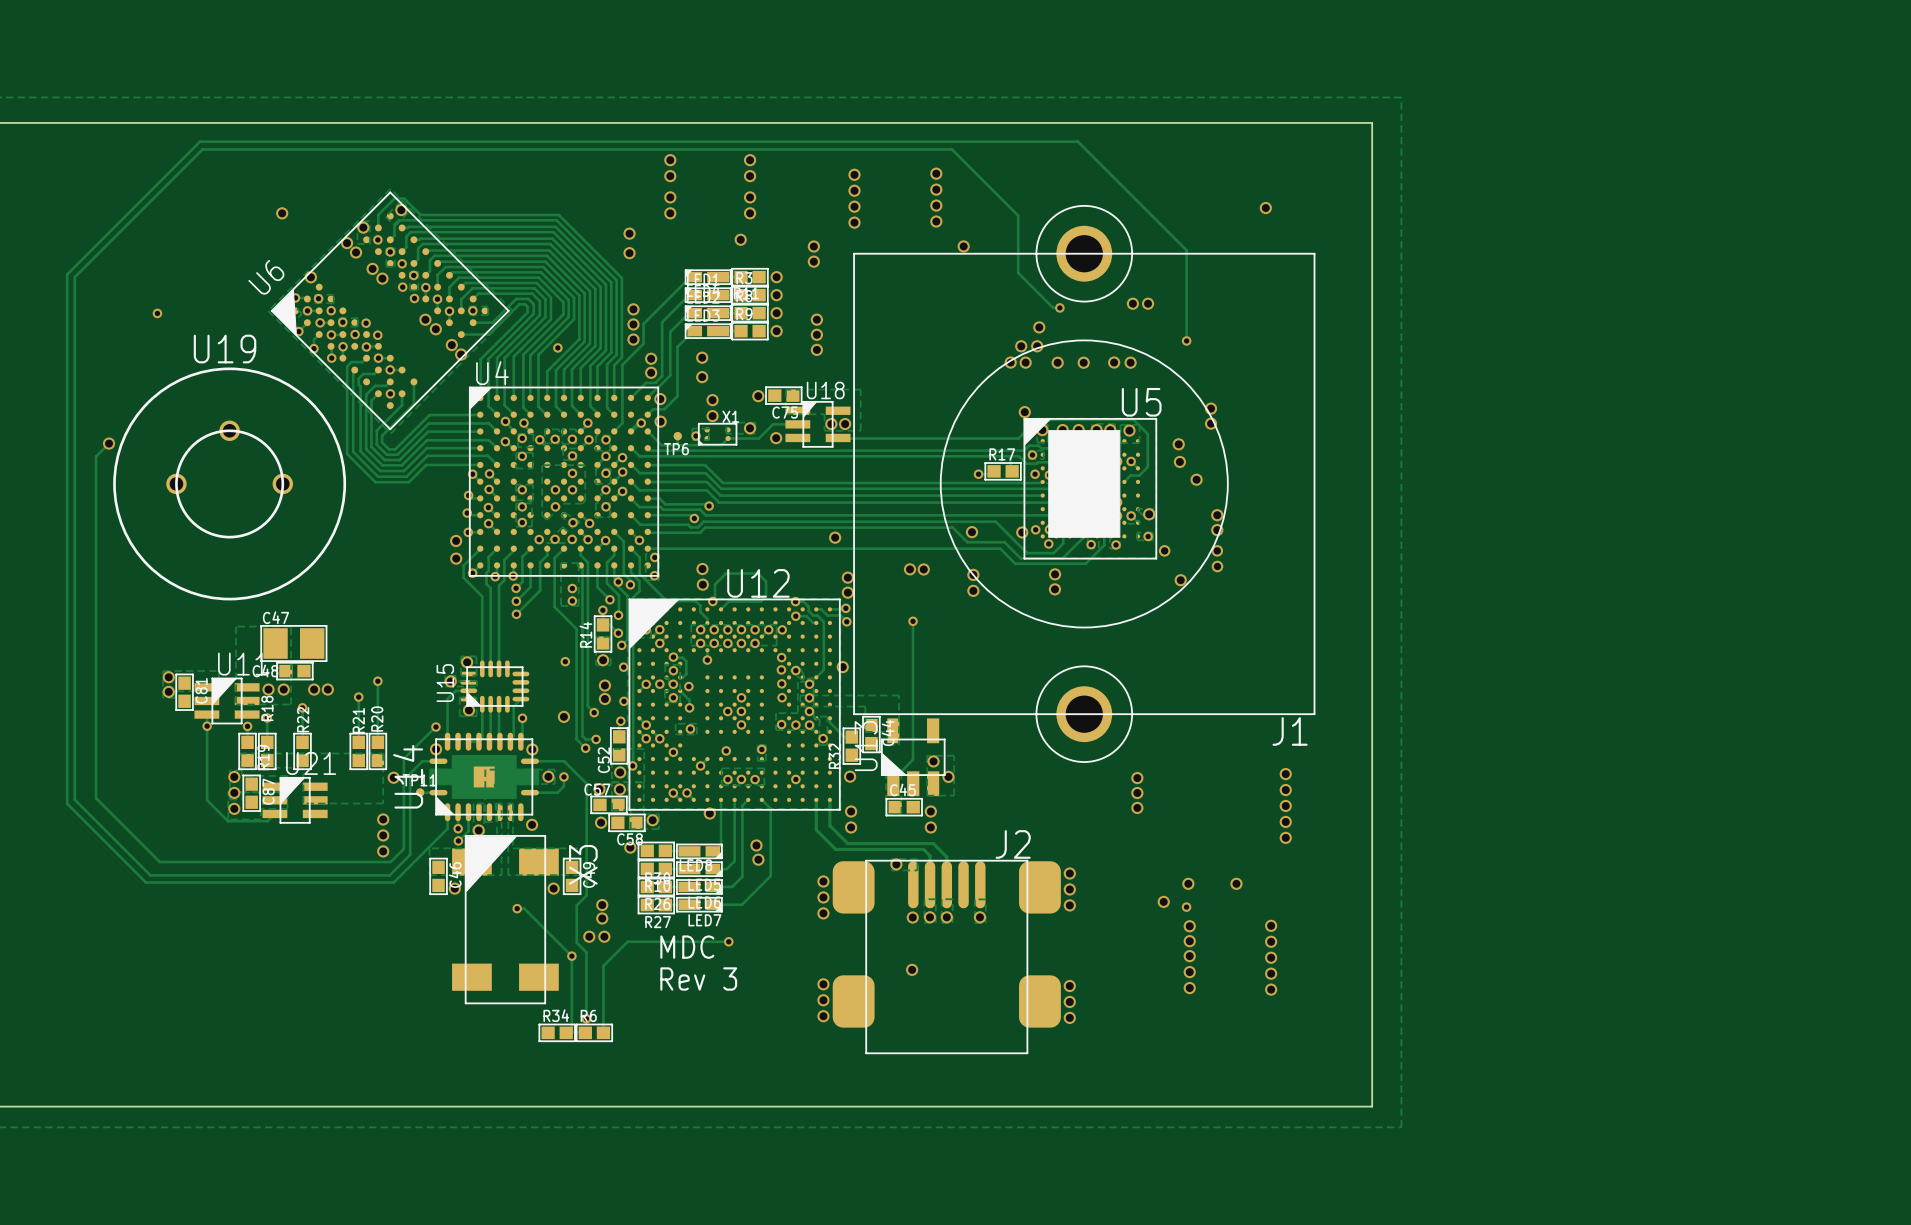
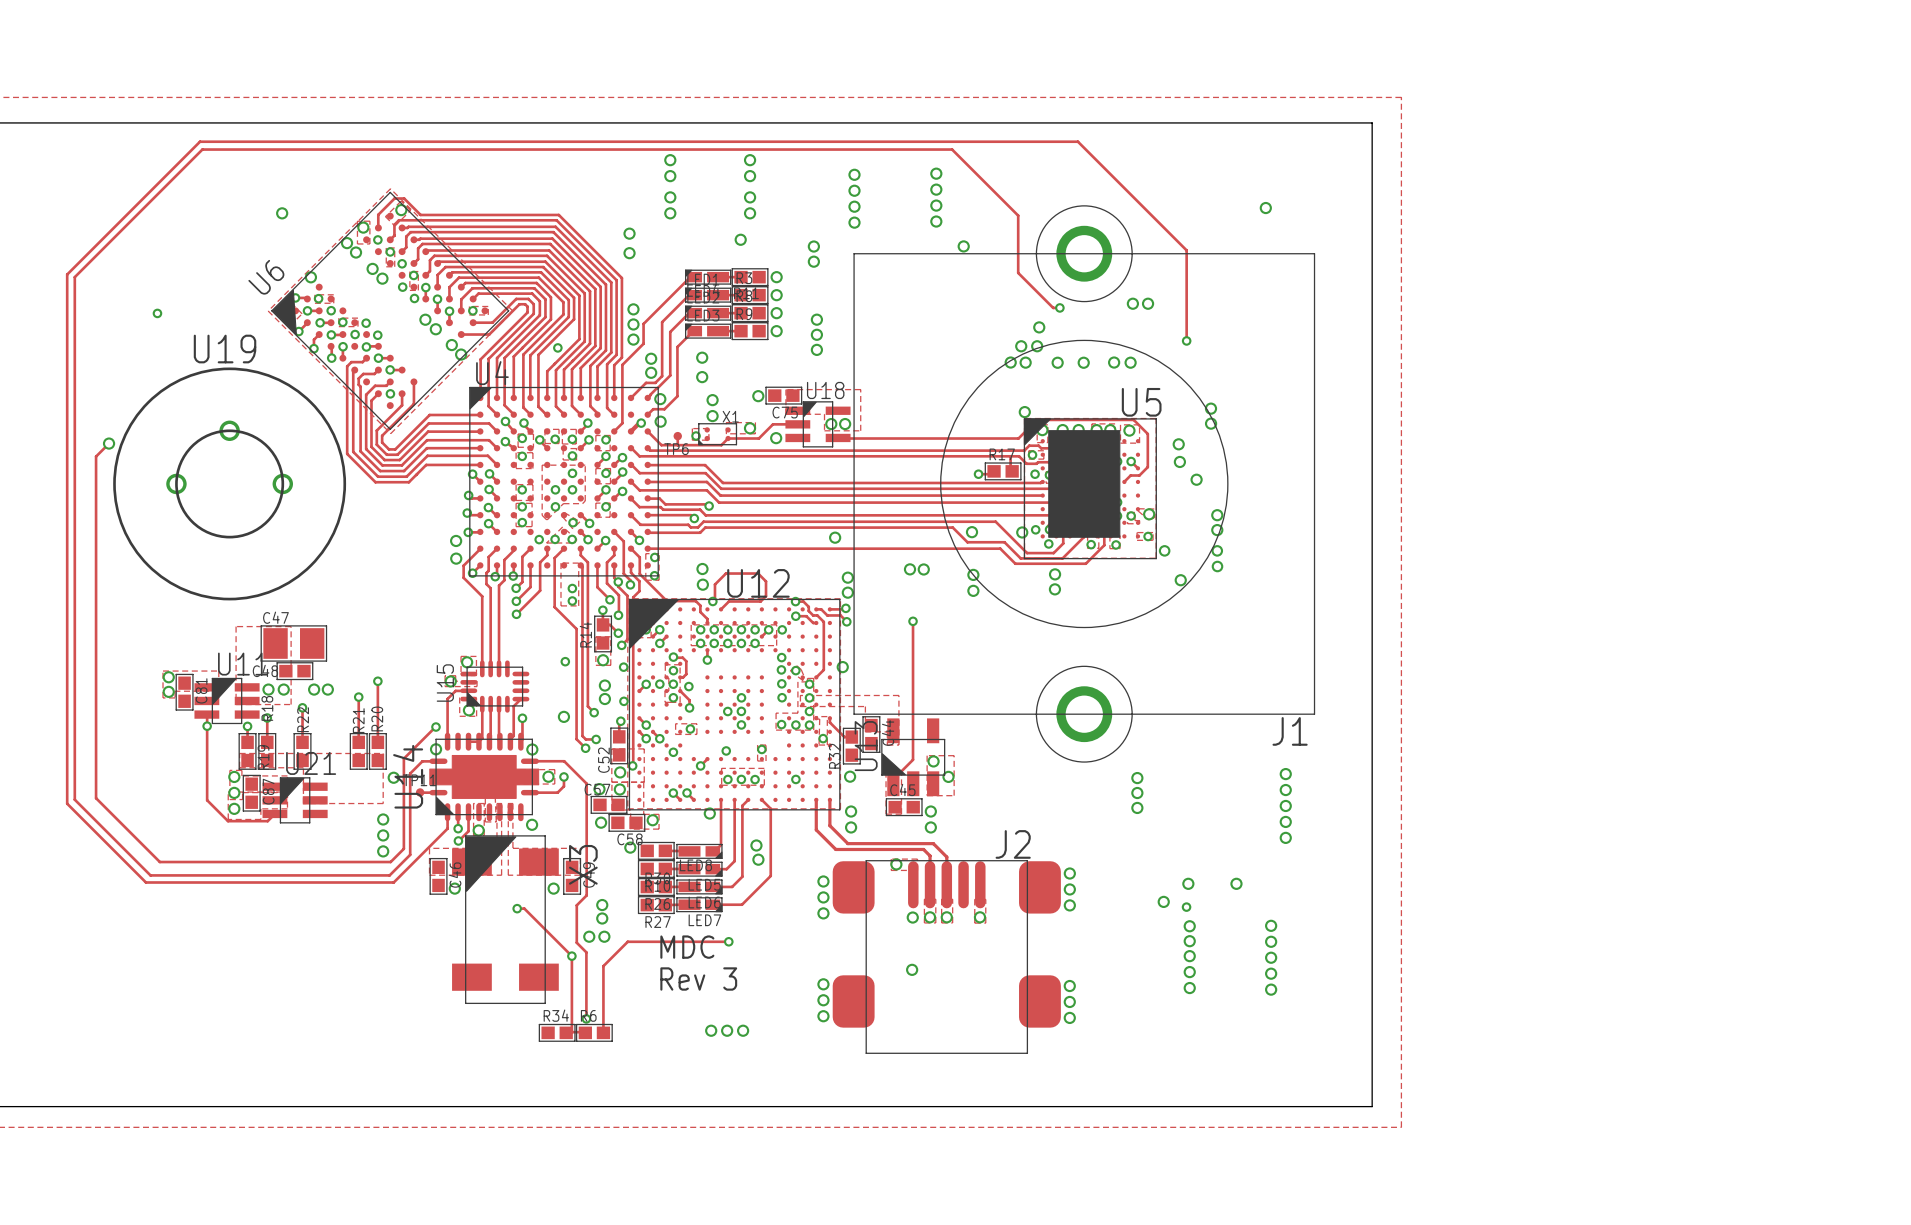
via: none -> (711, 1030)
via: none -> (727, 1030)
via: none -> (743, 1030)

